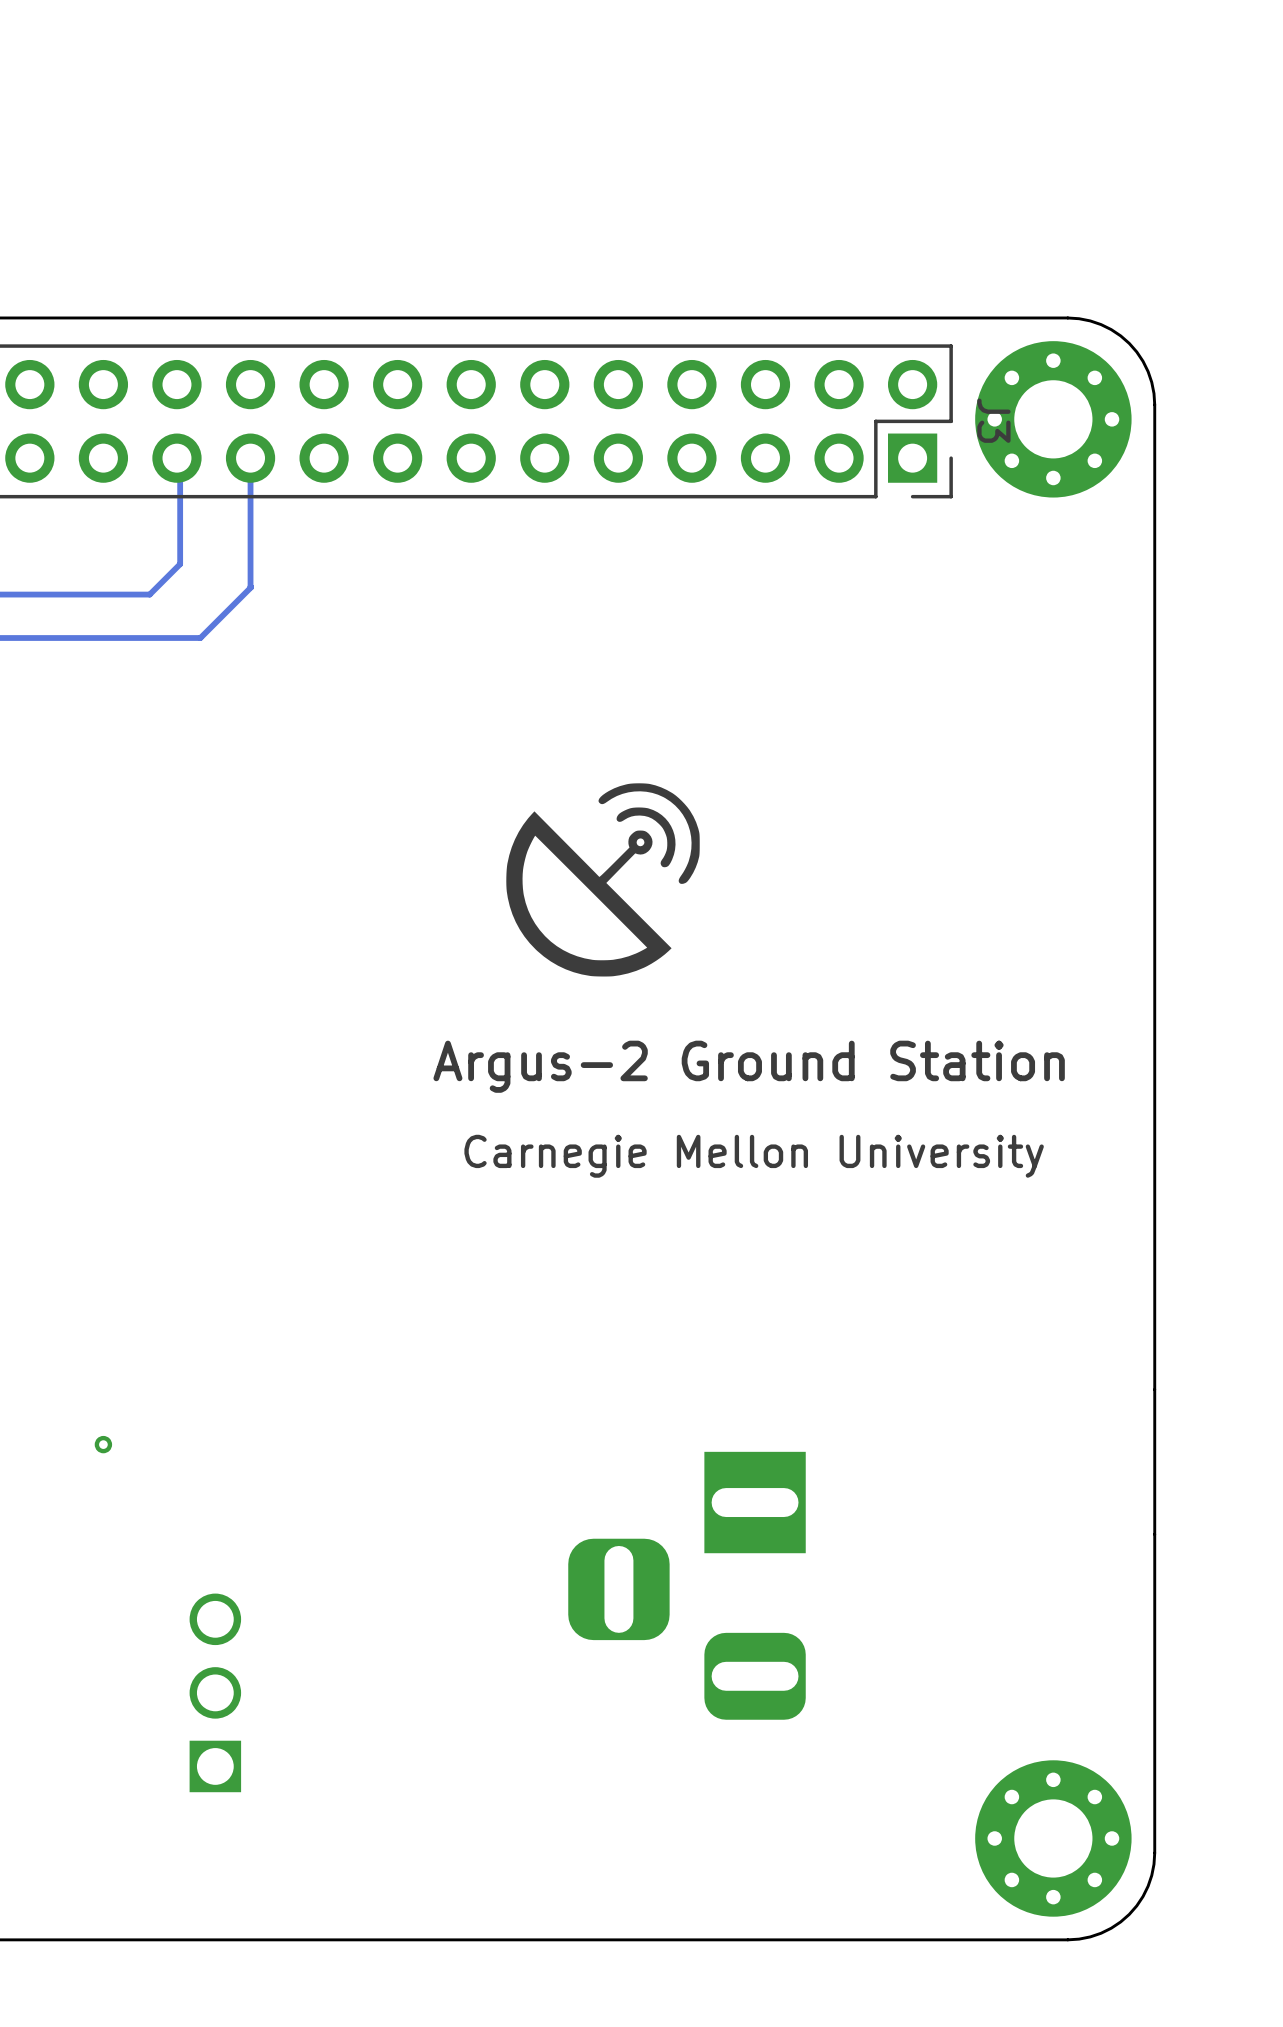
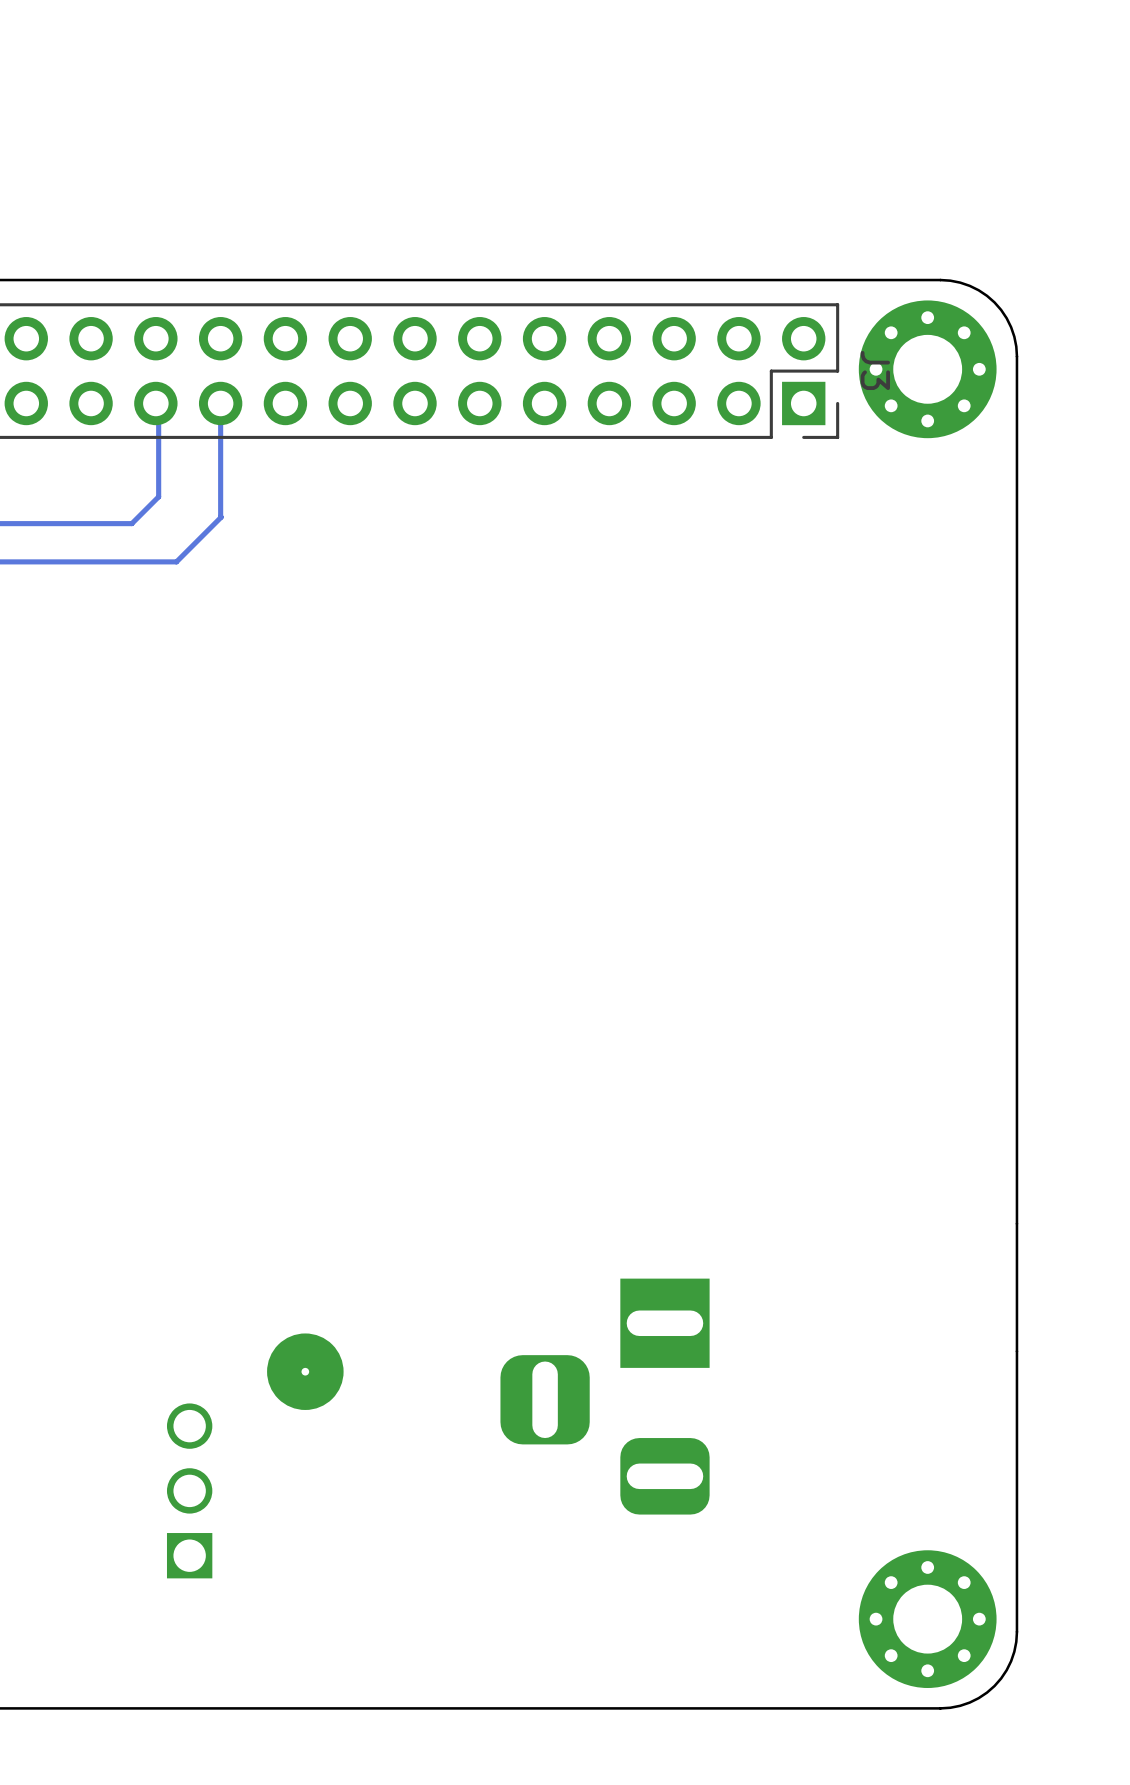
drawing: [506, 783, 700, 977] -> none
text: Argus-2 Ground Station (749, 1066) -> none
text: Carnegie Mellon University (754, 1156) -> none
via: (103, 1444) -> none
via: none -> (305, 1371)

